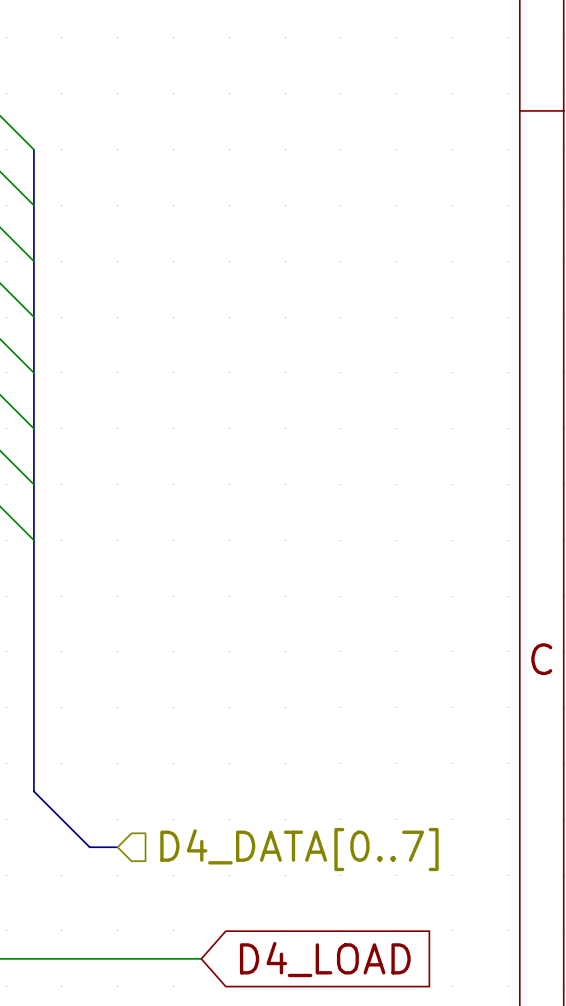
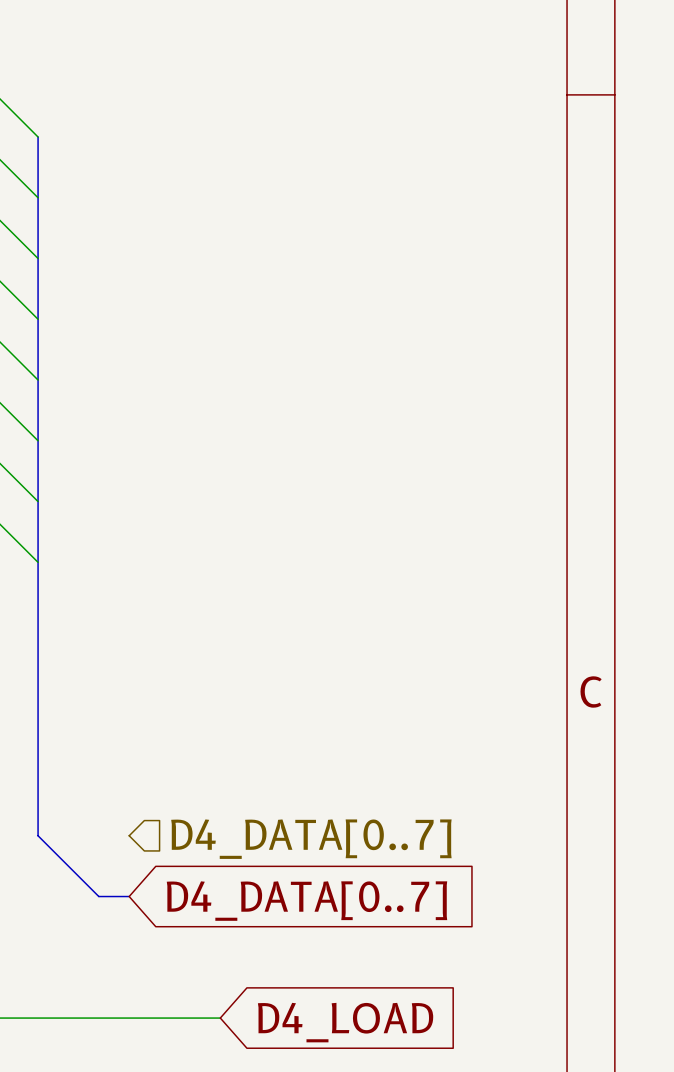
hierarchical label position: D4_DATA[0..7] (299, 849) -> D4_DATA[0..7] (311, 839)
global label: none -> D4_DATA[0..7] (306, 901)

